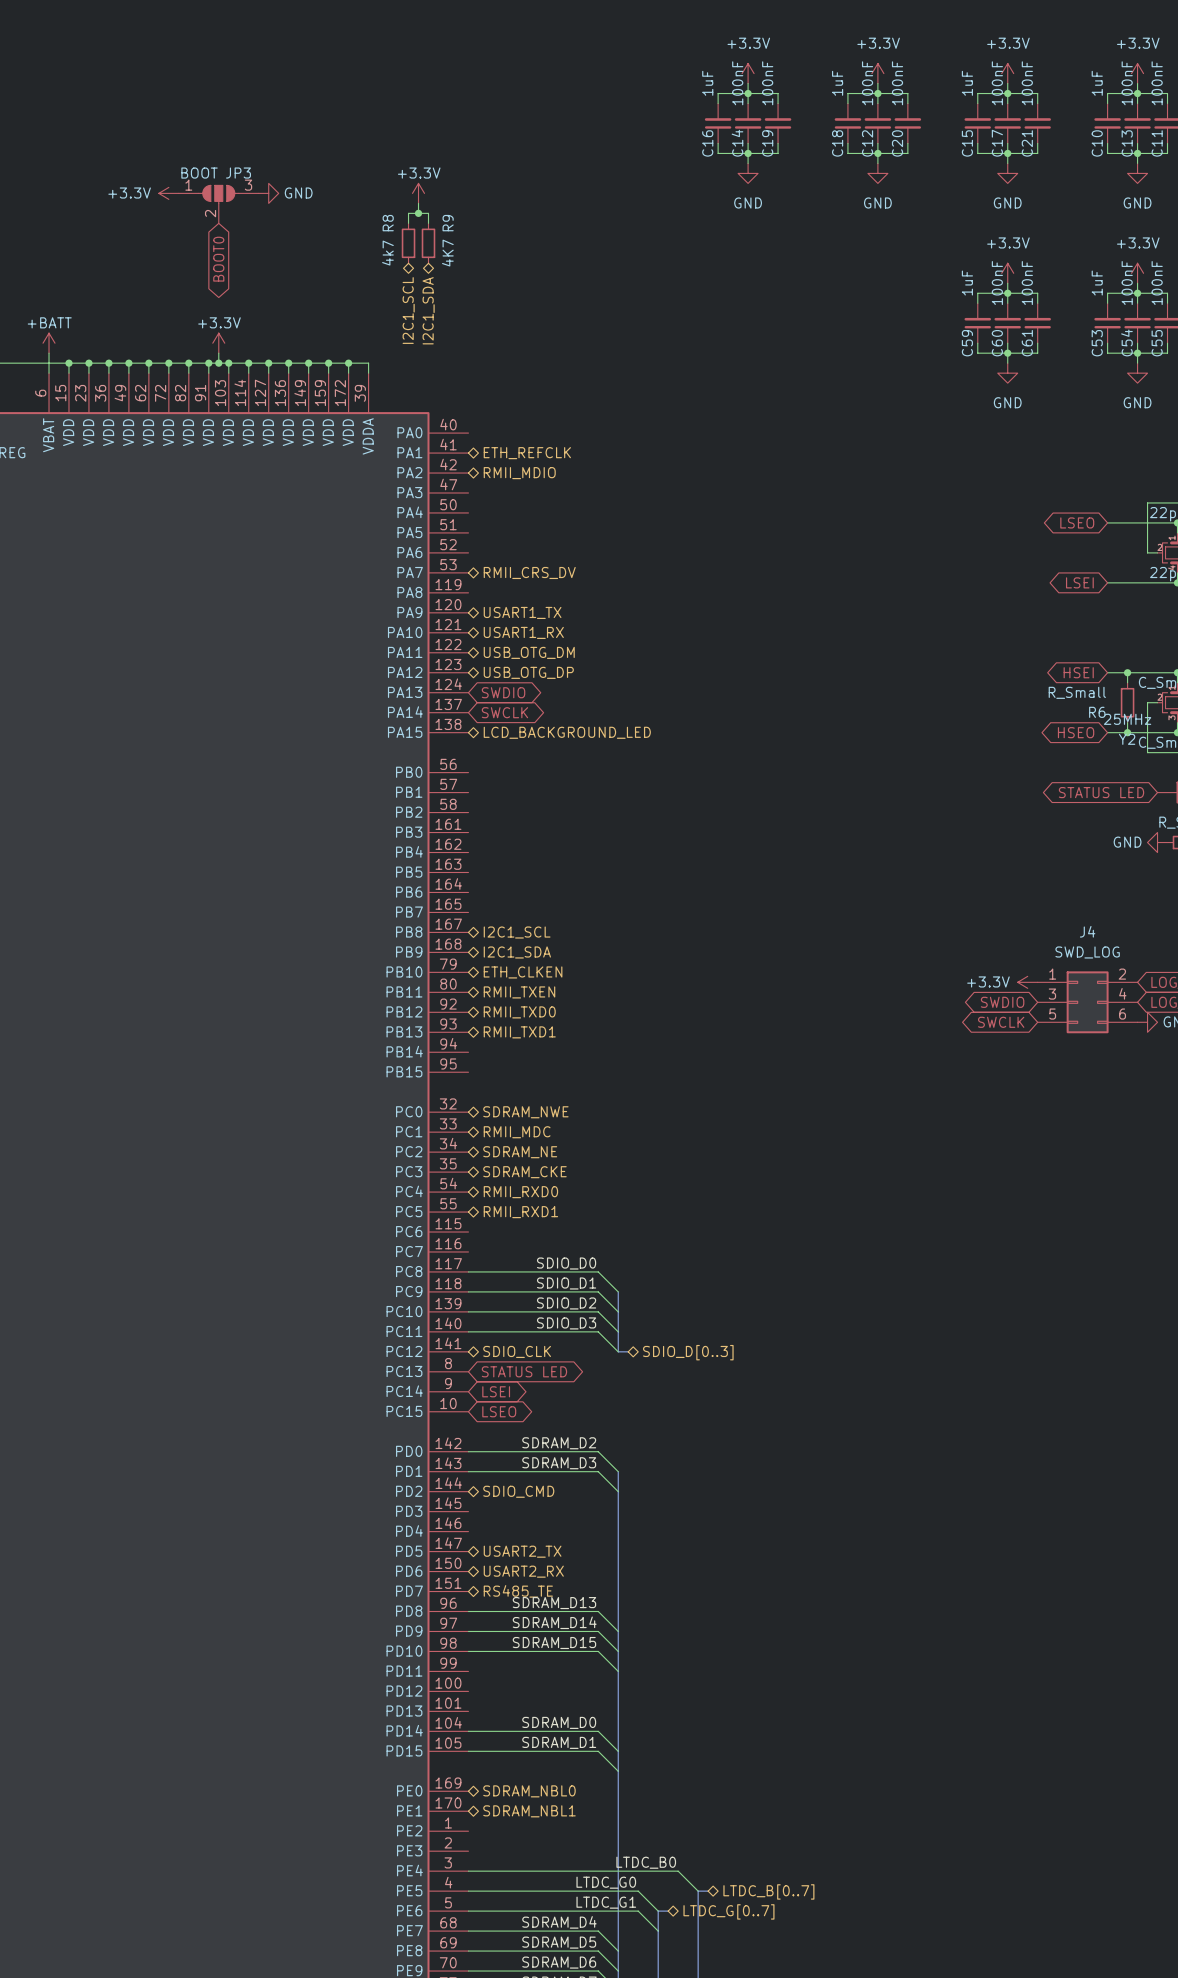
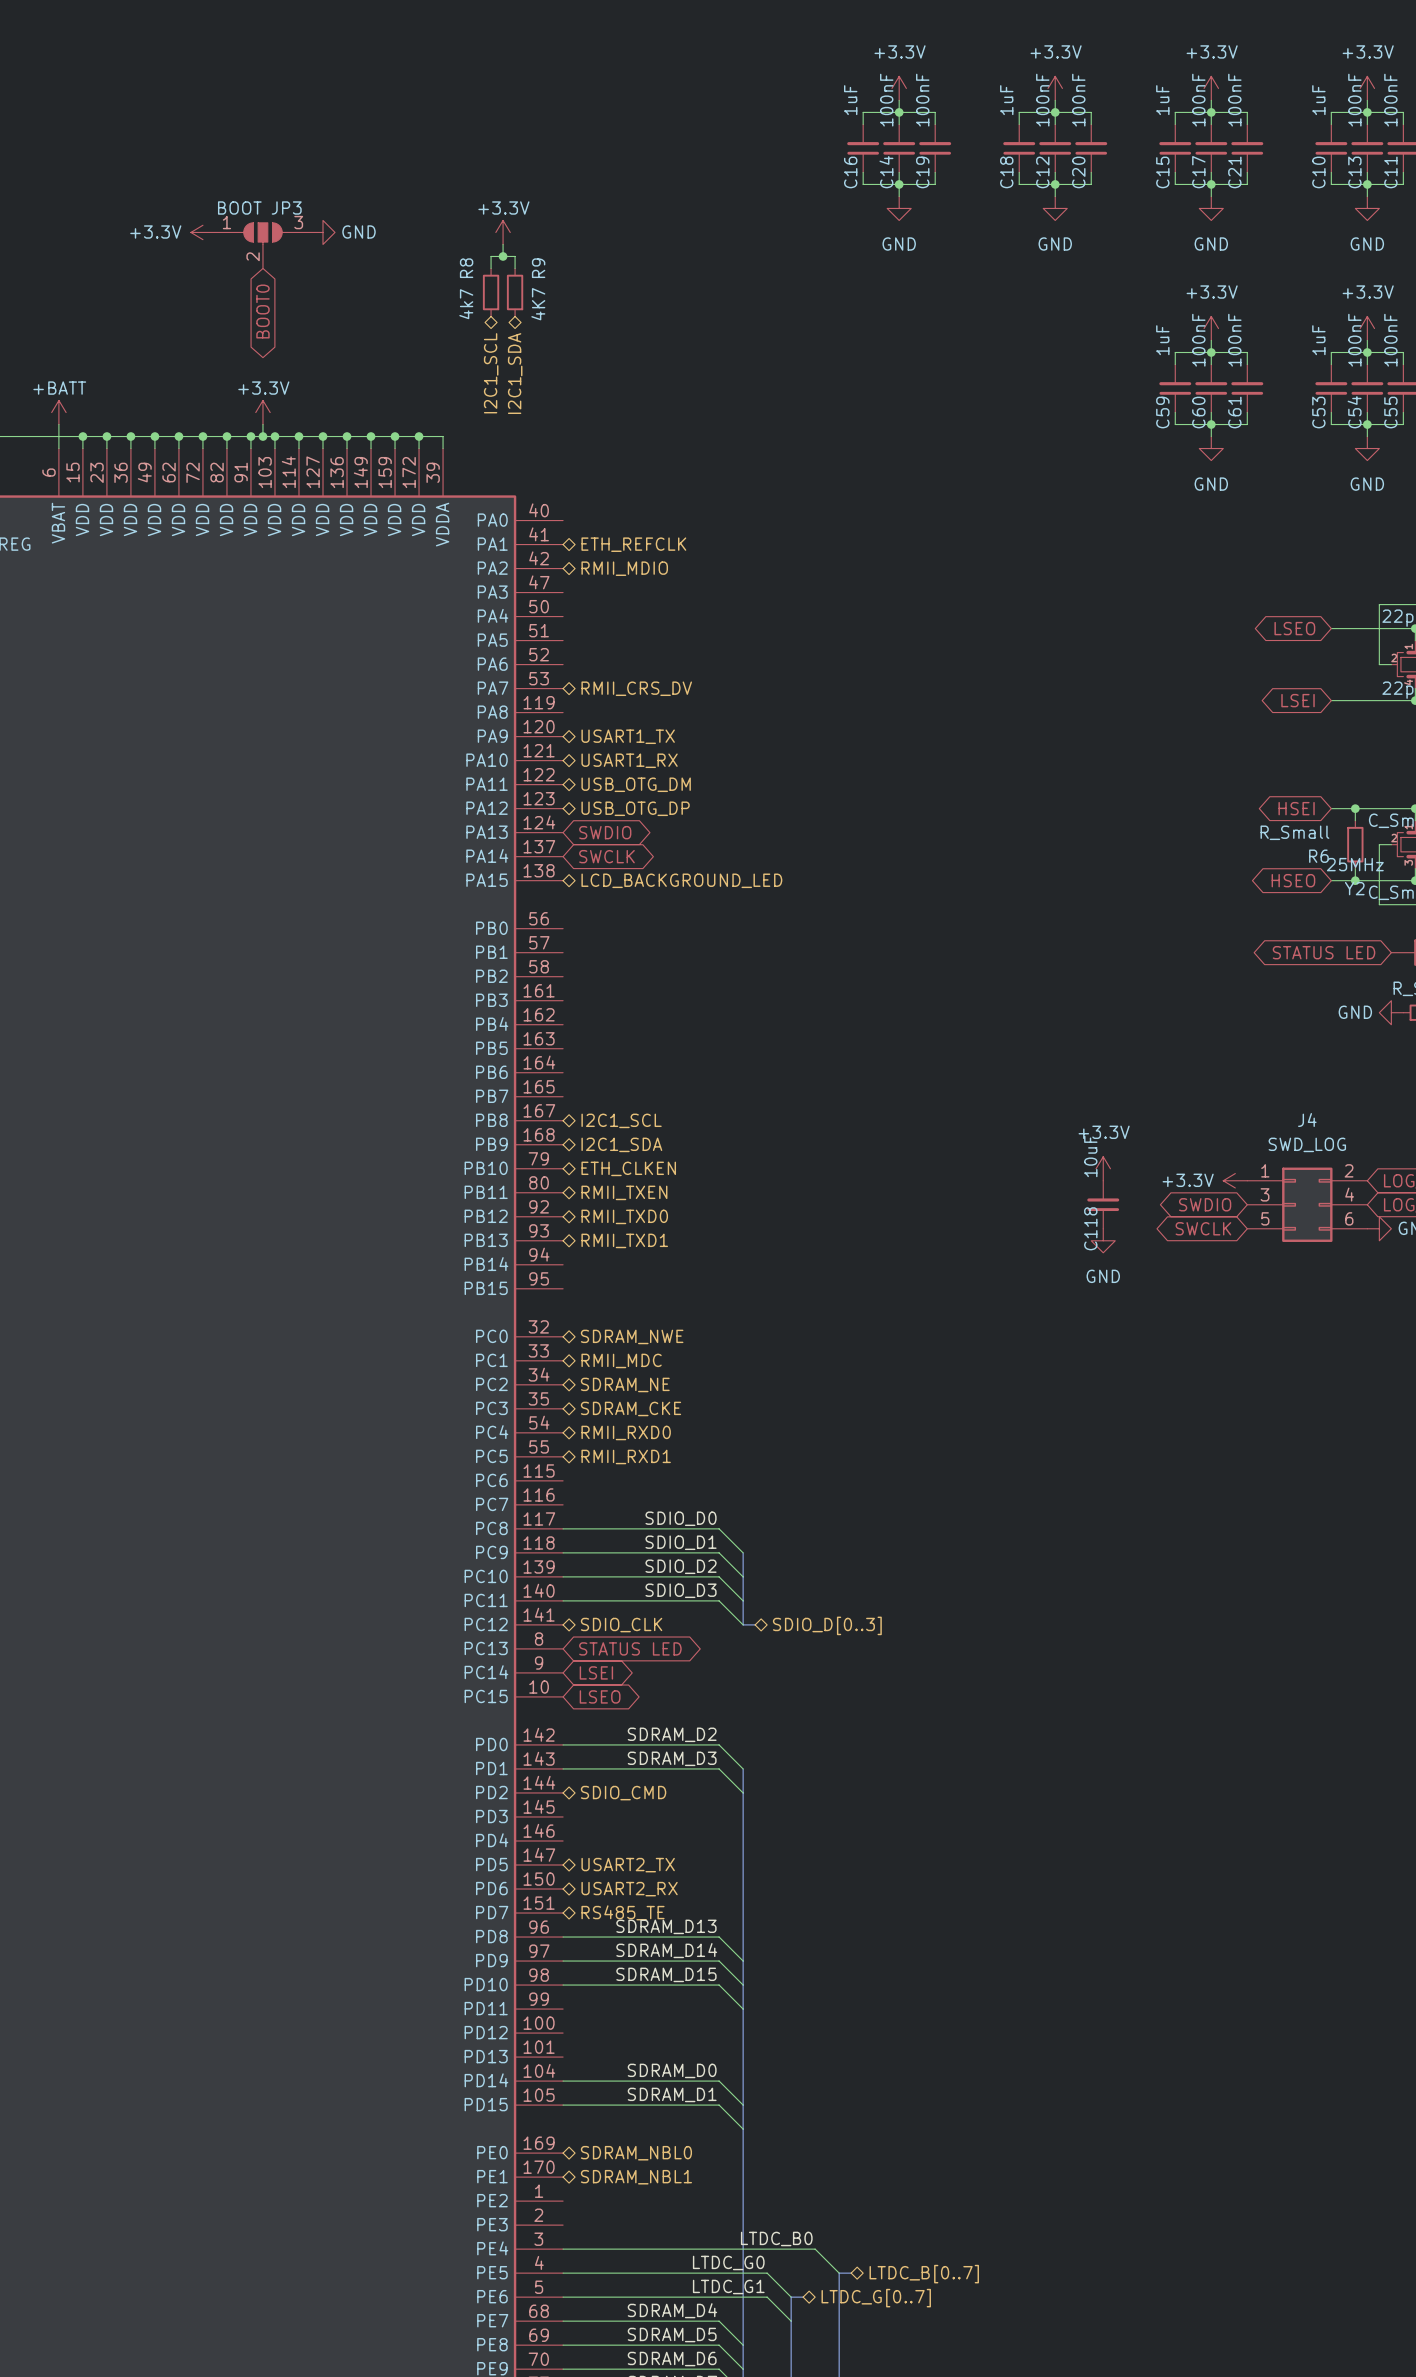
power symbol: none -> +3.3V (1103, 1168)
C118: none -> 10uF (1103, 1204)
power symbol: none -> GND (1103, 1240)

